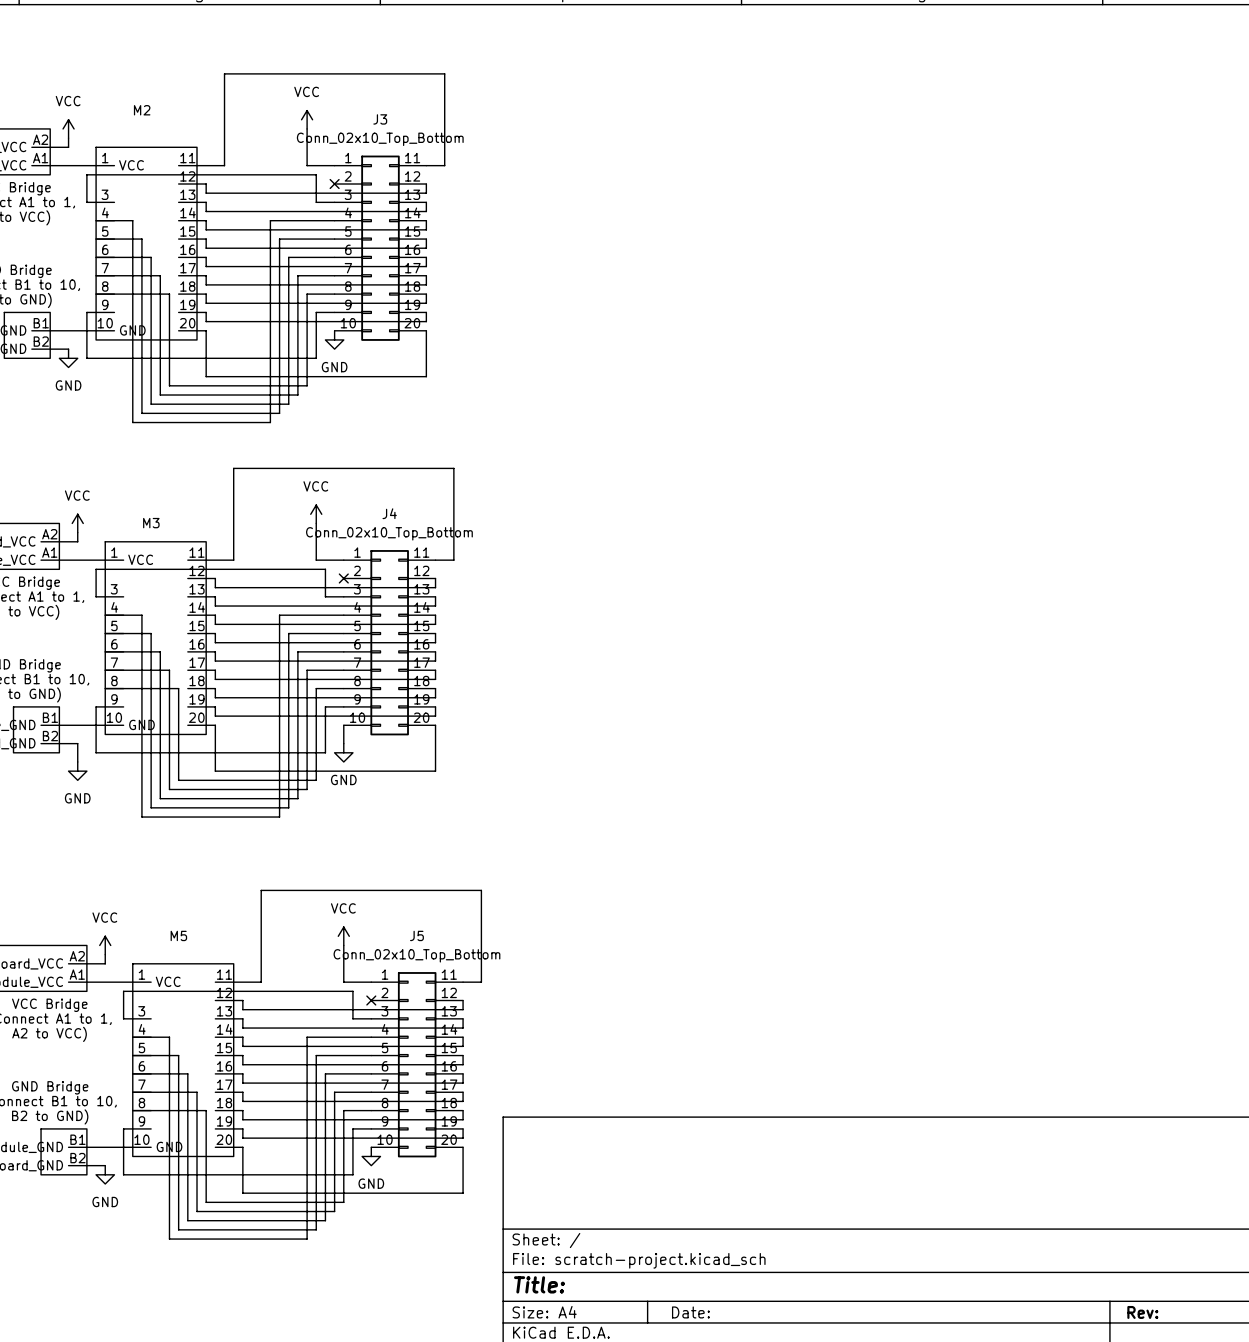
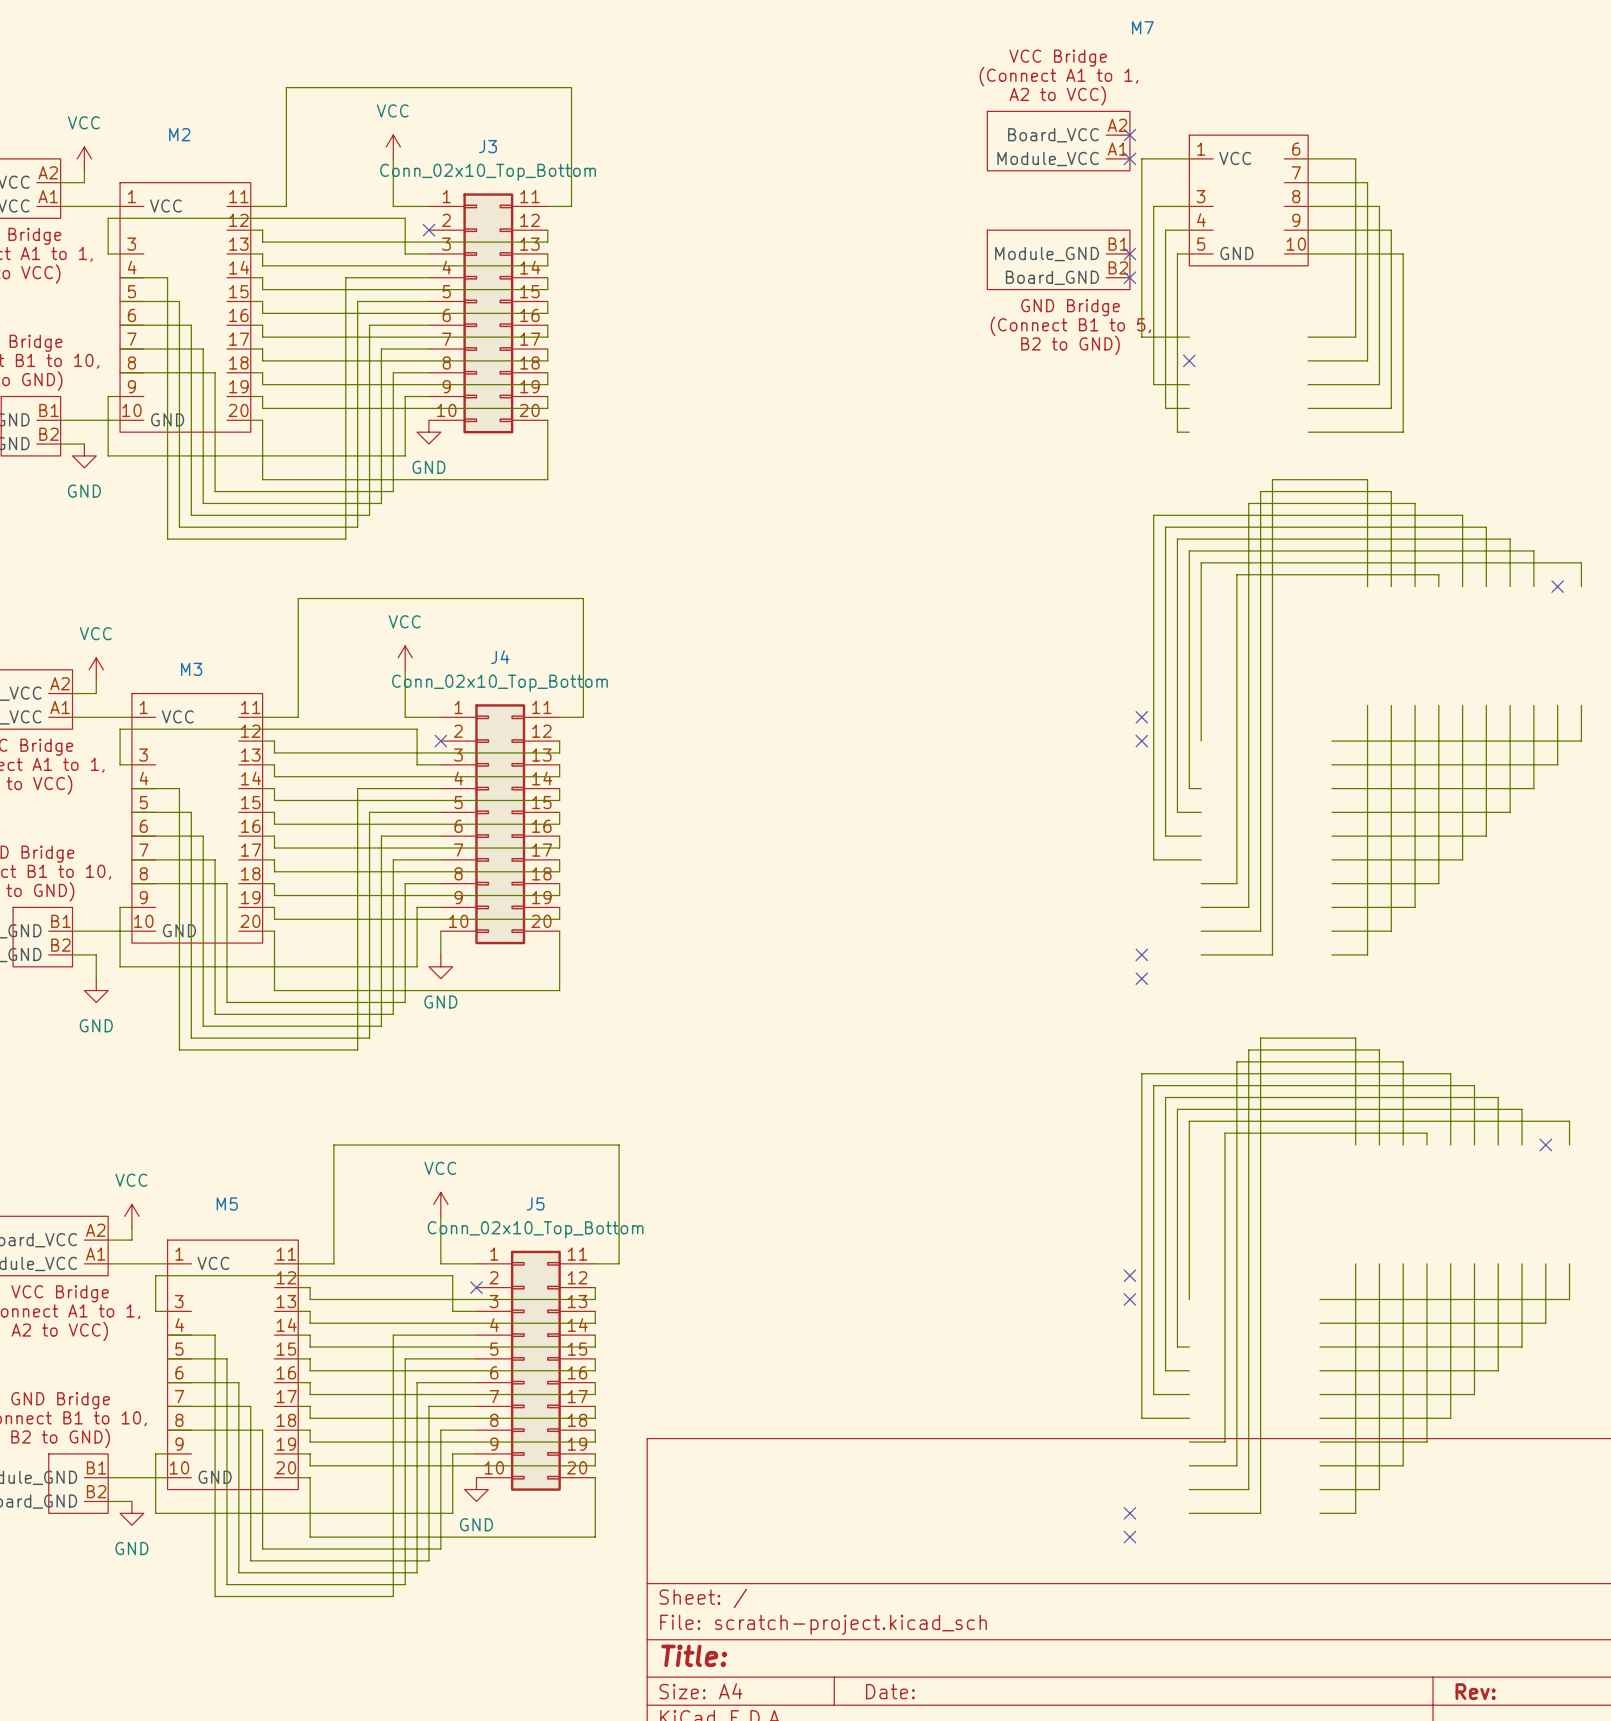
no-connect mark: none -> (1129, 135)
no-connect mark: none -> (1129, 158)
wire: none -> (1189, 158) (1141, 158) (1141, 337) (1189, 337)
wire: none -> (1308, 158) (1355, 158) (1355, 337) (1308, 337)
wire: none -> (1308, 182) (1367, 182) (1367, 360) (1308, 360)
M7: none -> (1147, 200)
wire: none -> (1189, 206) (1153, 206) (1153, 384) (1189, 384)
wire: none -> (1308, 206) (1379, 206) (1379, 384) (1308, 384)
wire: none -> (1189, 230) (1165, 230) (1165, 408) (1189, 408)
wire: none -> (1308, 230) (1391, 230) (1391, 408) (1308, 408)
no-connect mark: none -> (1129, 253)
wire: none -> (1189, 253) (1177, 253) (1177, 432) (1189, 432)
wire: none -> (1308, 253) (1403, 253) (1403, 432) (1308, 432)
no-connect mark: none -> (1129, 277)
no-connect mark: none -> (1189, 360)
wire: none -> (1367, 586) (1367, 479) (1272, 479) (1272, 954) (1201, 954)
wire: none -> (1391, 586) (1391, 491) (1260, 491) (1260, 931) (1201, 931)
wire: none -> (1415, 586) (1415, 503) (1248, 503) (1248, 907) (1201, 907)
wire: none -> (1438, 586) (1438, 574) (1236, 574) (1236, 883) (1201, 883)
wire: none -> (1462, 586) (1462, 515) (1153, 515) (1153, 859) (1201, 859)
wire: none -> (1486, 586) (1486, 527) (1165, 527) (1165, 836) (1201, 836)
wire: none -> (1510, 586) (1510, 539) (1177, 539) (1177, 812) (1201, 812)
wire: none -> (1533, 586) (1533, 550) (1189, 550) (1189, 788) (1201, 788)
no-connect mark: none -> (1557, 586)
wire: none -> (1581, 586) (1581, 562) (1201, 562) (1201, 741)
wire: none -> (1367, 705) (1367, 954) (1331, 954)
wire: none -> (1391, 705) (1391, 931) (1331, 931)
wire: none -> (1415, 705) (1415, 907) (1331, 907)
wire: none -> (1438, 705) (1438, 883) (1331, 883)
wire: none -> (1462, 705) (1462, 859) (1331, 859)
wire: none -> (1486, 705) (1486, 836) (1331, 836)
wire: none -> (1510, 705) (1510, 812) (1331, 812)
wire: none -> (1533, 705) (1533, 788) (1331, 788)
wire: none -> (1557, 705) (1557, 764) (1331, 764)
wire: none -> (1581, 705) (1581, 741) (1331, 741)
no-connect mark: none -> (1141, 717)
no-connect mark: none -> (1141, 741)
no-connect mark: none -> (1141, 954)
no-connect mark: none -> (1141, 978)
wire: none -> (1355, 1145) (1355, 1038) (1260, 1038) (1260, 1513) (1189, 1513)
wire: none -> (1379, 1145) (1379, 1049) (1248, 1049) (1248, 1489) (1189, 1489)
wire: none -> (1403, 1145) (1403, 1061) (1236, 1061) (1236, 1465) (1189, 1465)
wire: none -> (1426, 1145) (1426, 1133) (1224, 1133) (1224, 1442) (1189, 1442)
wire: none -> (1450, 1145) (1450, 1073) (1141, 1073) (1141, 1418) (1189, 1418)
wire: none -> (1474, 1145) (1474, 1085) (1153, 1085) (1153, 1394) (1189, 1394)
wire: none -> (1498, 1145) (1498, 1097) (1165, 1097) (1165, 1370) (1189, 1370)
wire: none -> (1522, 1145) (1522, 1109) (1177, 1109) (1177, 1347) (1189, 1347)
no-connect mark: none -> (1545, 1145)
wire: none -> (1569, 1145) (1569, 1121) (1189, 1121) (1189, 1299)
wire: none -> (1355, 1263) (1355, 1513) (1320, 1513)
wire: none -> (1379, 1263) (1379, 1489) (1320, 1489)
wire: none -> (1403, 1263) (1403, 1465) (1320, 1465)
wire: none -> (1426, 1263) (1426, 1442) (1320, 1442)
wire: none -> (1450, 1263) (1450, 1418) (1320, 1418)
wire: none -> (1474, 1263) (1474, 1394) (1320, 1394)
wire: none -> (1498, 1263) (1498, 1370) (1320, 1370)
wire: none -> (1522, 1263) (1522, 1347) (1320, 1347)
wire: none -> (1545, 1263) (1545, 1323) (1320, 1323)
wire: none -> (1569, 1263) (1569, 1299) (1320, 1299)
no-connect mark: none -> (1129, 1275)
no-connect mark: none -> (1129, 1299)
no-connect mark: none -> (1129, 1513)
no-connect mark: none -> (1129, 1537)

